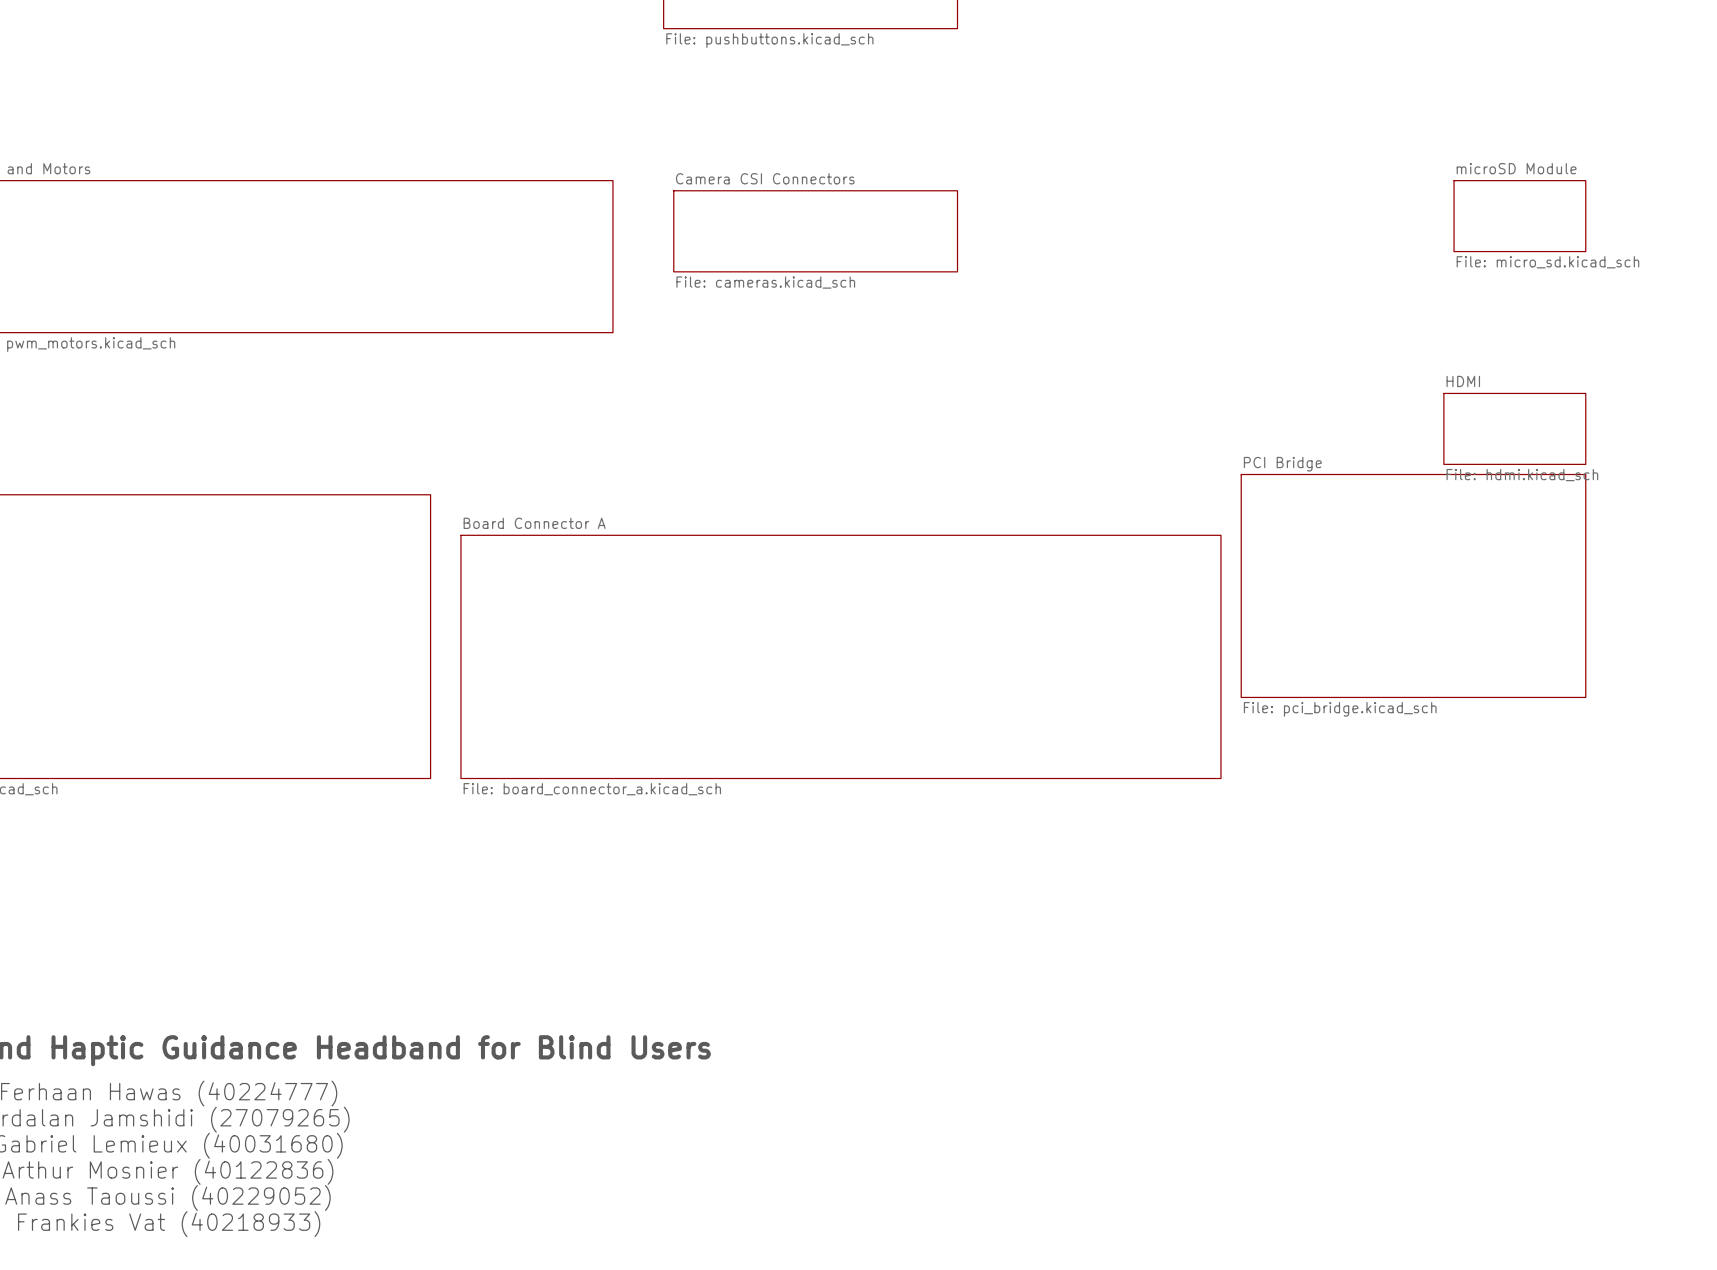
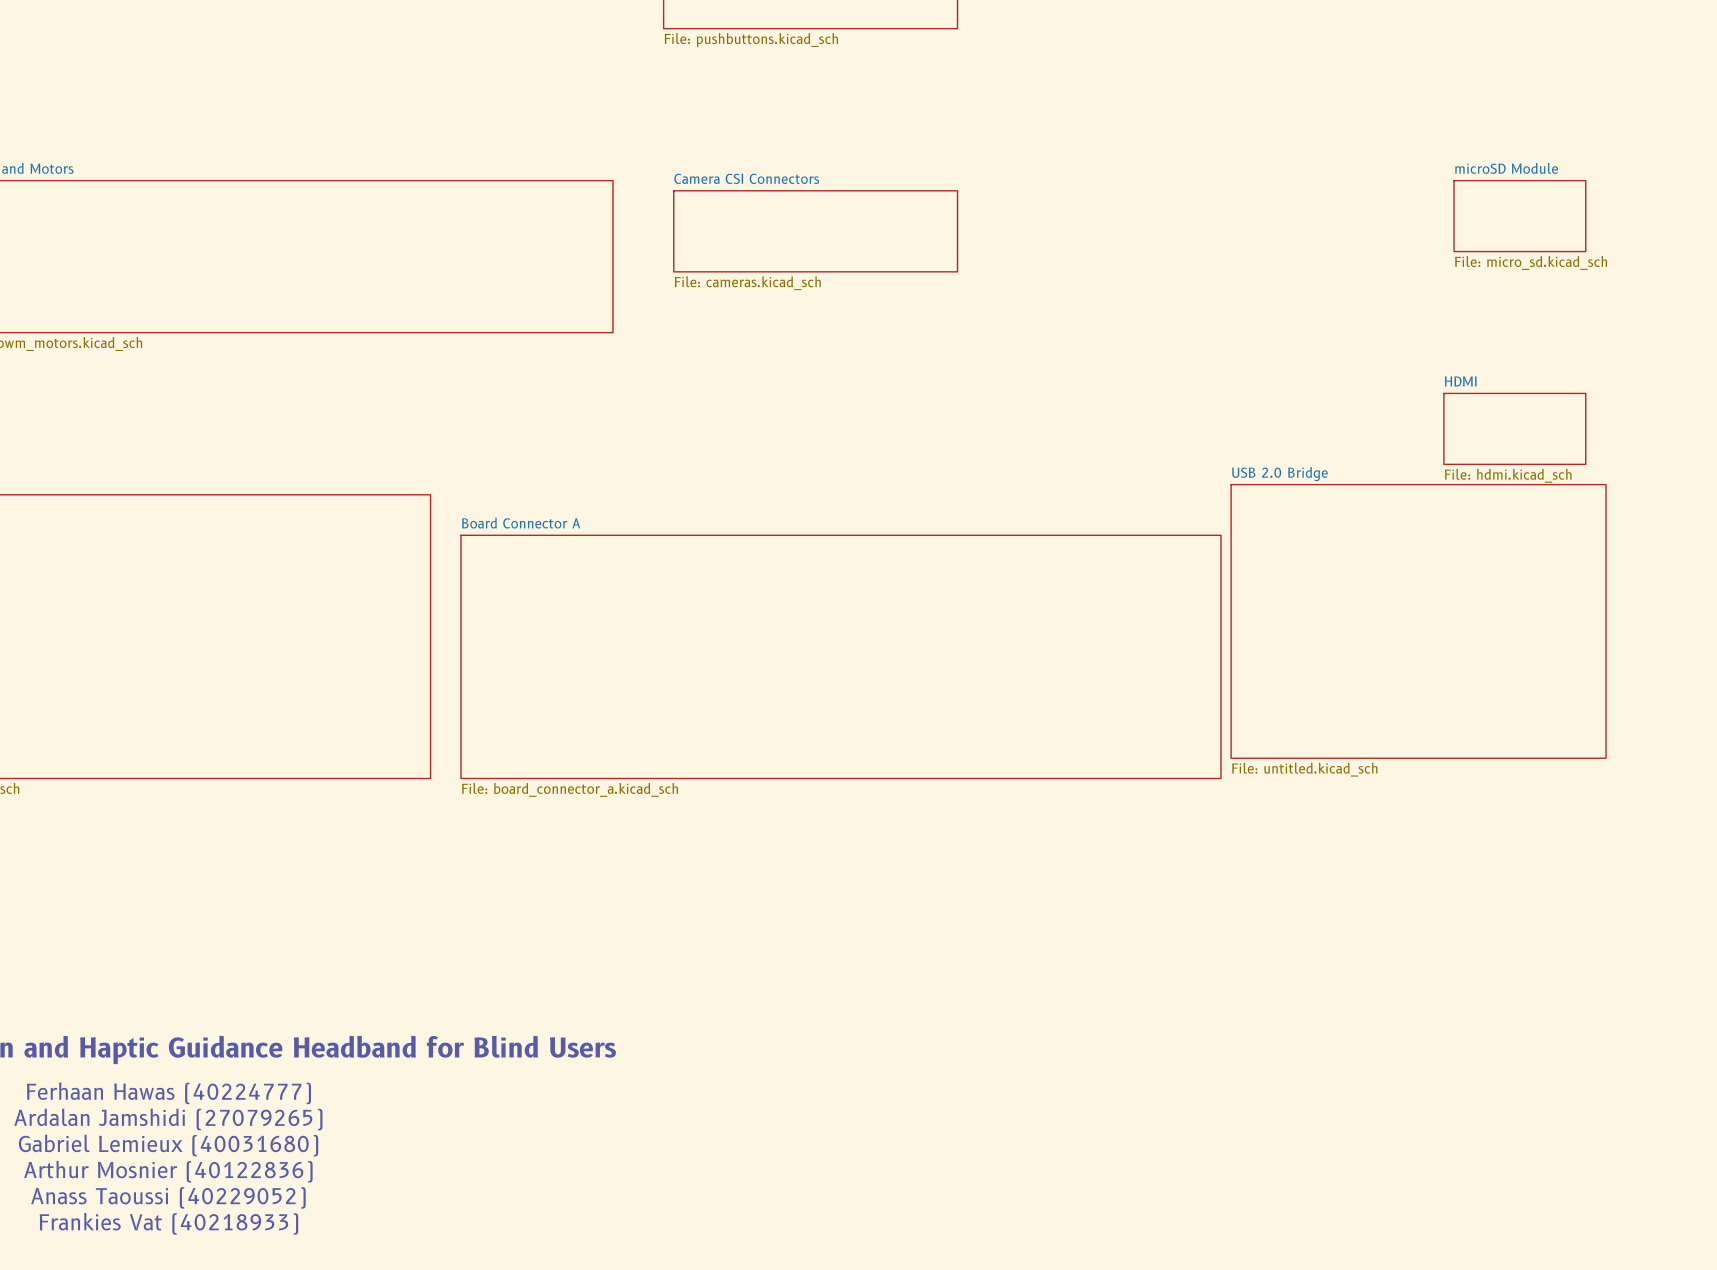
sheet PCI Bridge: File: pci_bridge.kicad_sch (1413, 585) -> none
sheet USB 2.0 Bridge: none -> File: untitled.kicad_sch (1418, 621)

